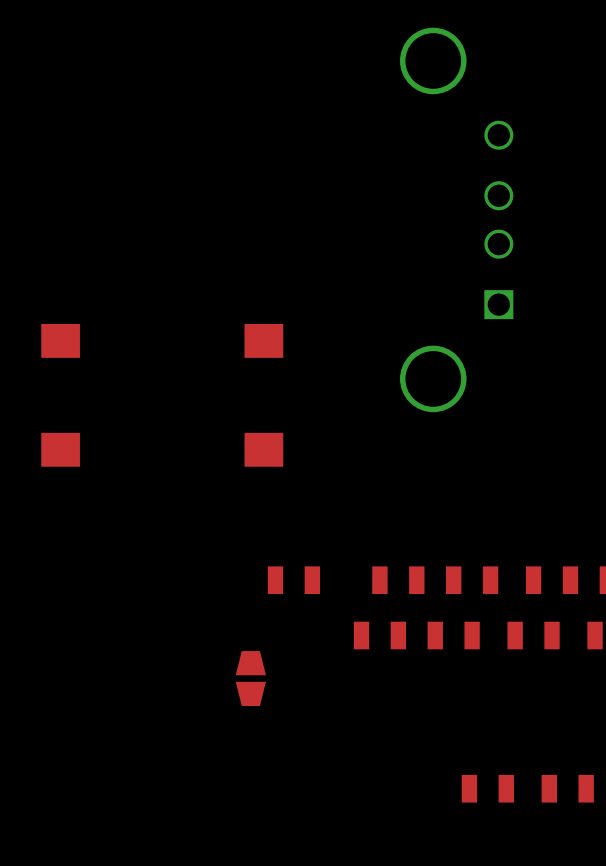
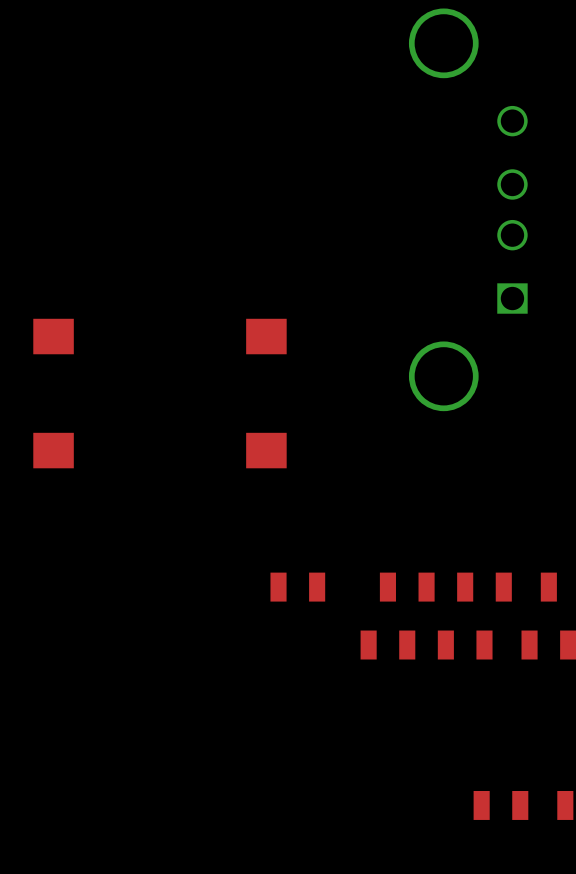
part: (250, 678) -> none

